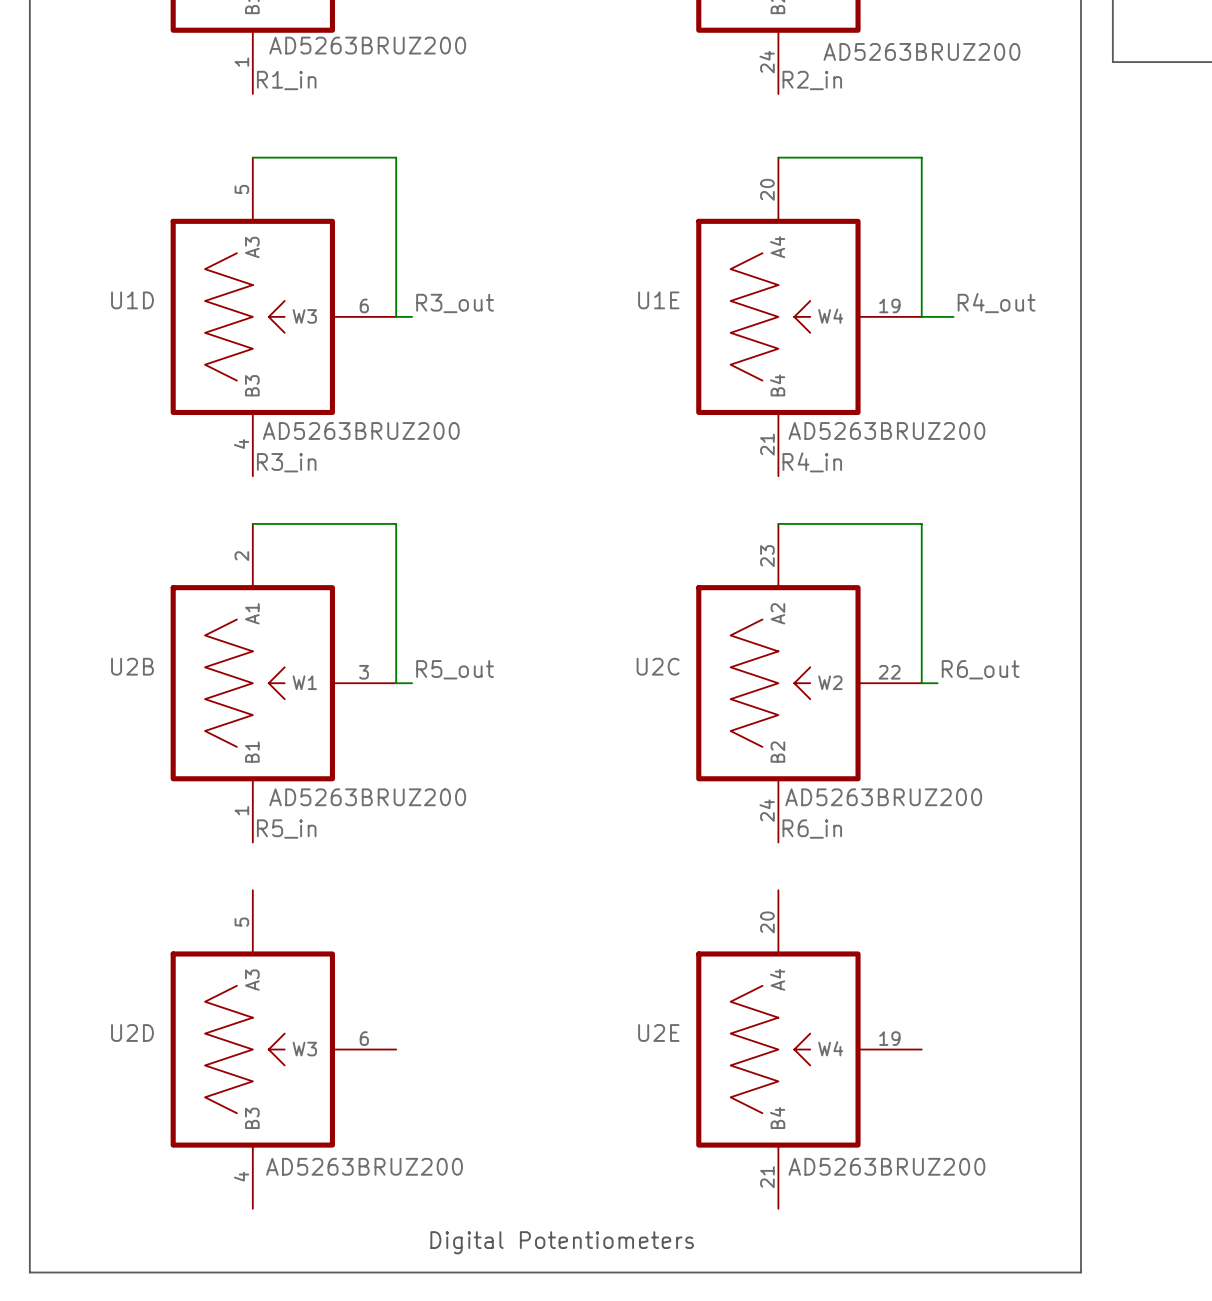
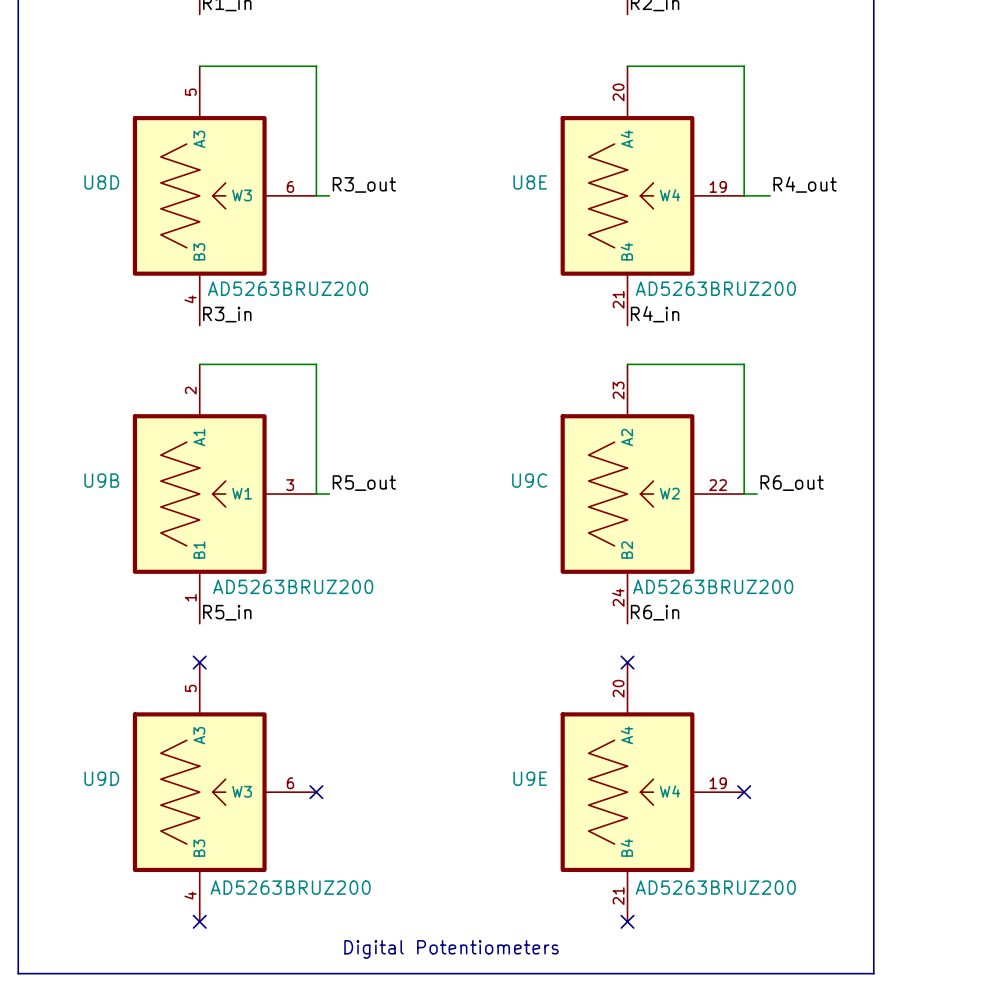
U1D name: U1D (132, 300) -> U8D (101, 182)
U1E name: U1E (658, 300) -> U8E (530, 182)
U2B name: U2B (132, 666) -> U9B (101, 480)
U2C name: U2C (658, 666) -> U9C (529, 480)
no-connect mark: none -> (199, 662)
no-connect mark: none -> (627, 662)
U2D name: U2D (132, 1033) -> U9D (101, 778)
U2E name: U2E (658, 1033) -> U9E (530, 778)
no-connect mark: none -> (316, 792)
no-connect mark: none -> (744, 792)
no-connect mark: none -> (199, 921)
no-connect mark: none -> (627, 921)

